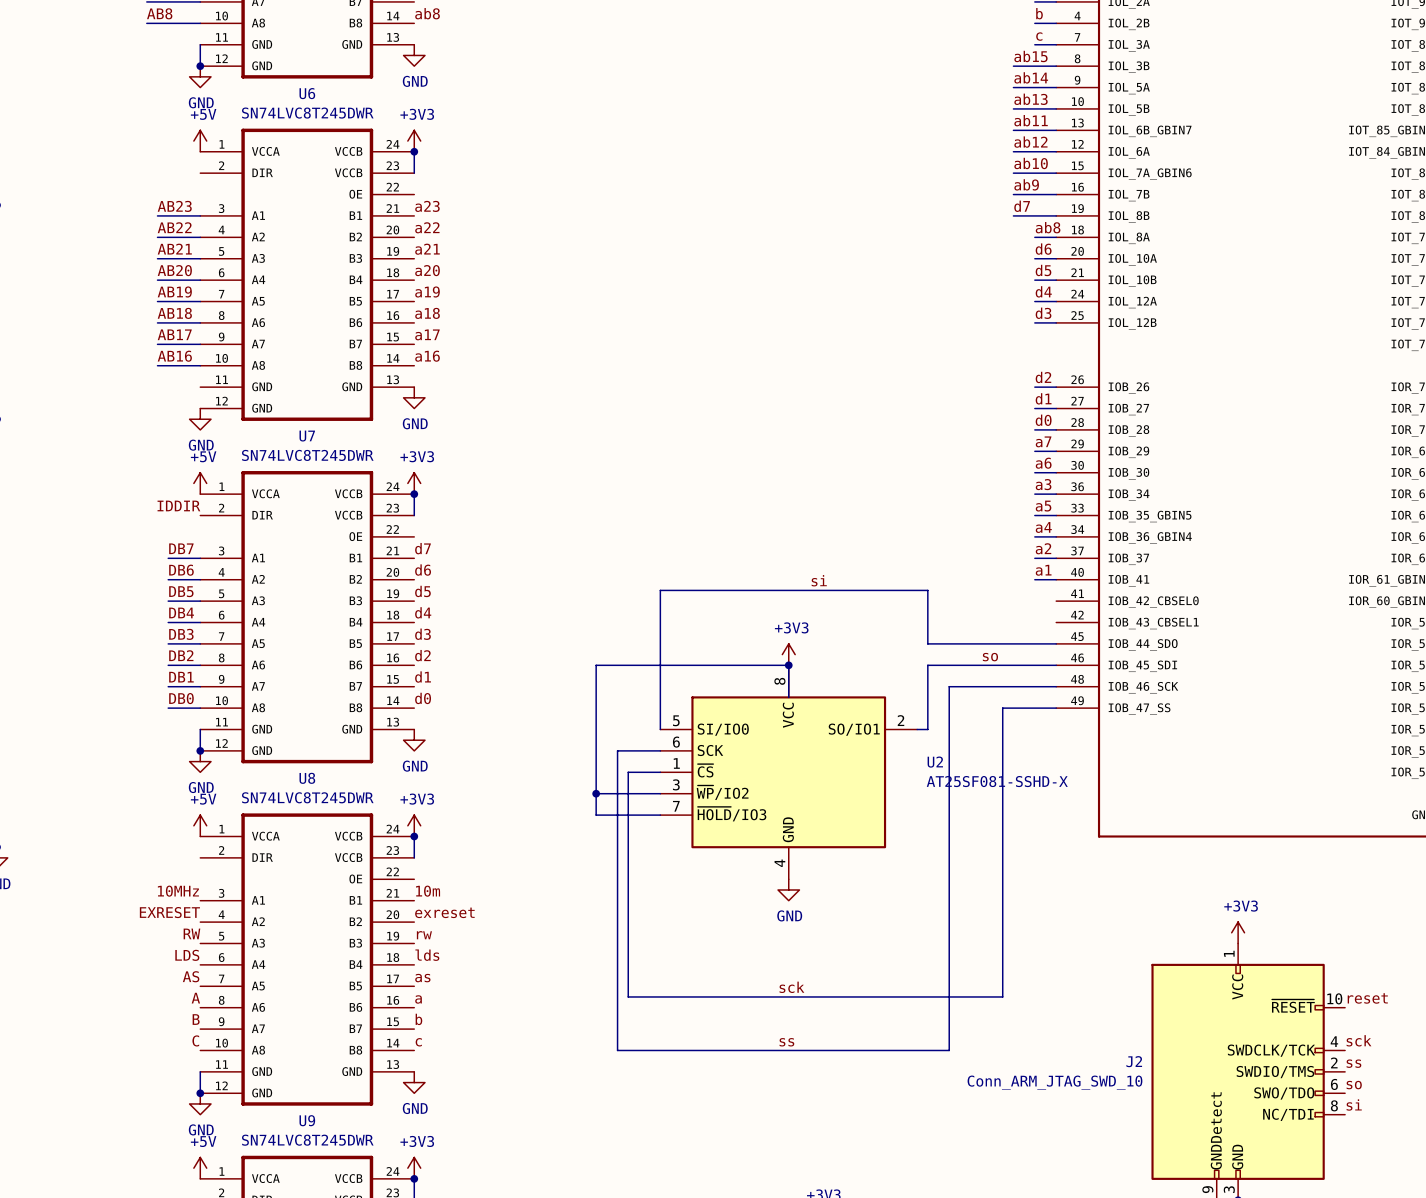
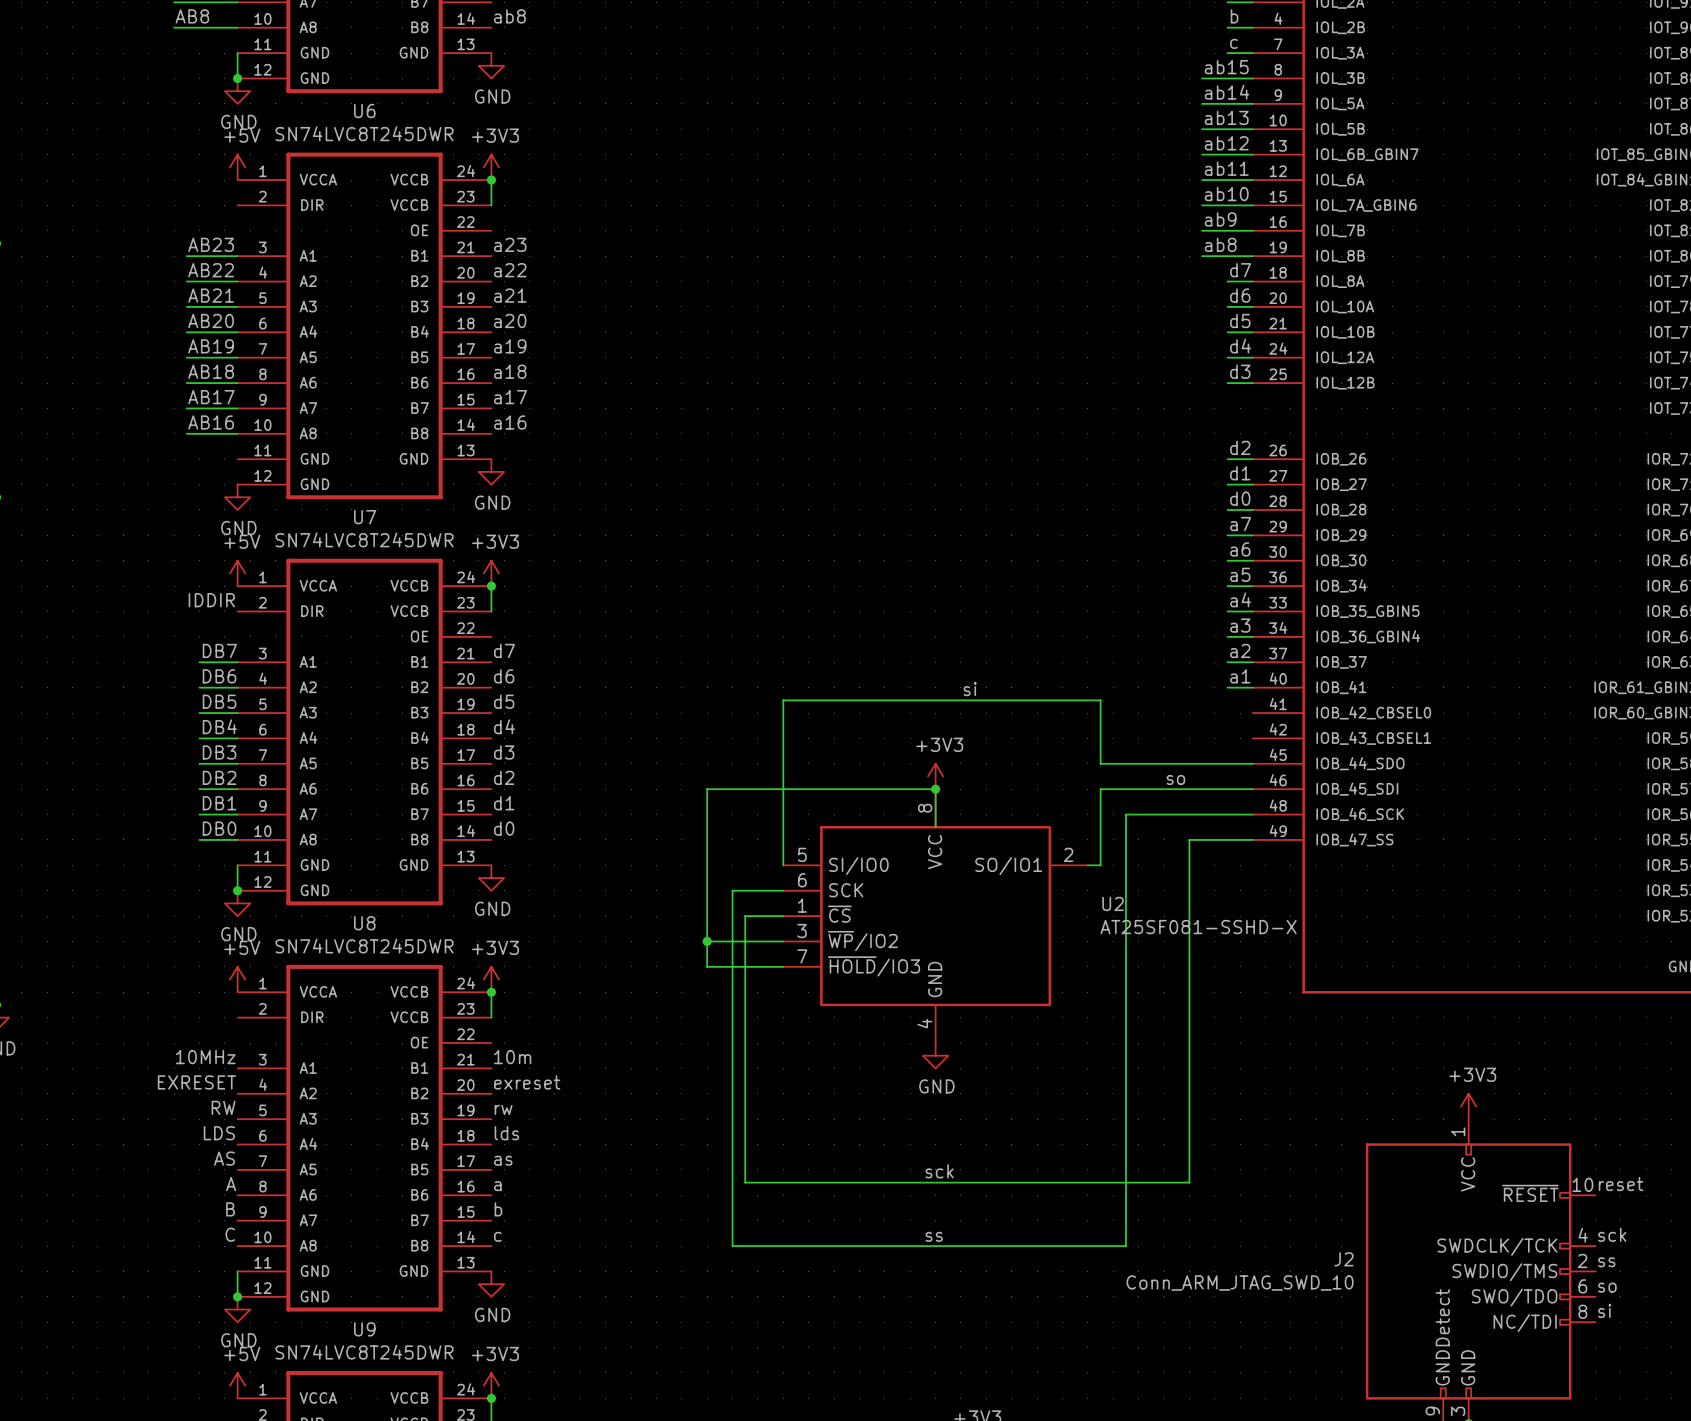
label: ab11 (1031, 120) -> ab12 (1226, 143)
label: ab12 (1030, 142) -> ab11 (1226, 168)
label: d7 (1022, 206) -> ab8 (1220, 244)
label: ab8 (1048, 227) -> d7 (1240, 270)
label: a3 (1043, 484) -> a5 (1240, 574)
label: a5 (1043, 506) -> a4 (1240, 599)
label: a4 (1043, 527) -> a3 (1240, 625)

